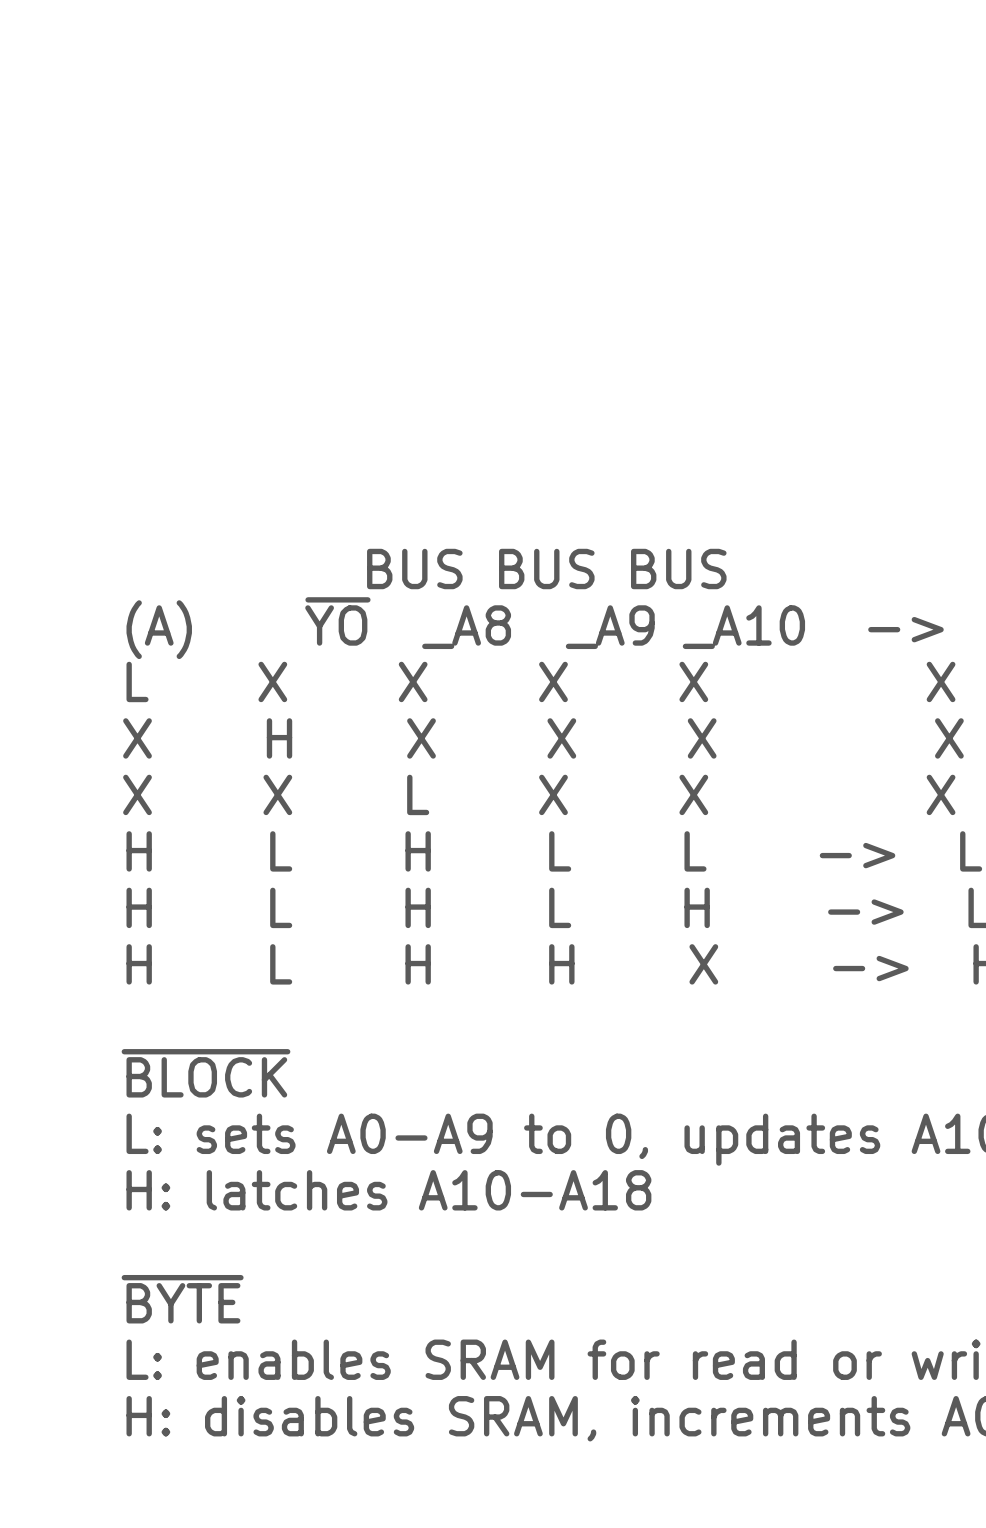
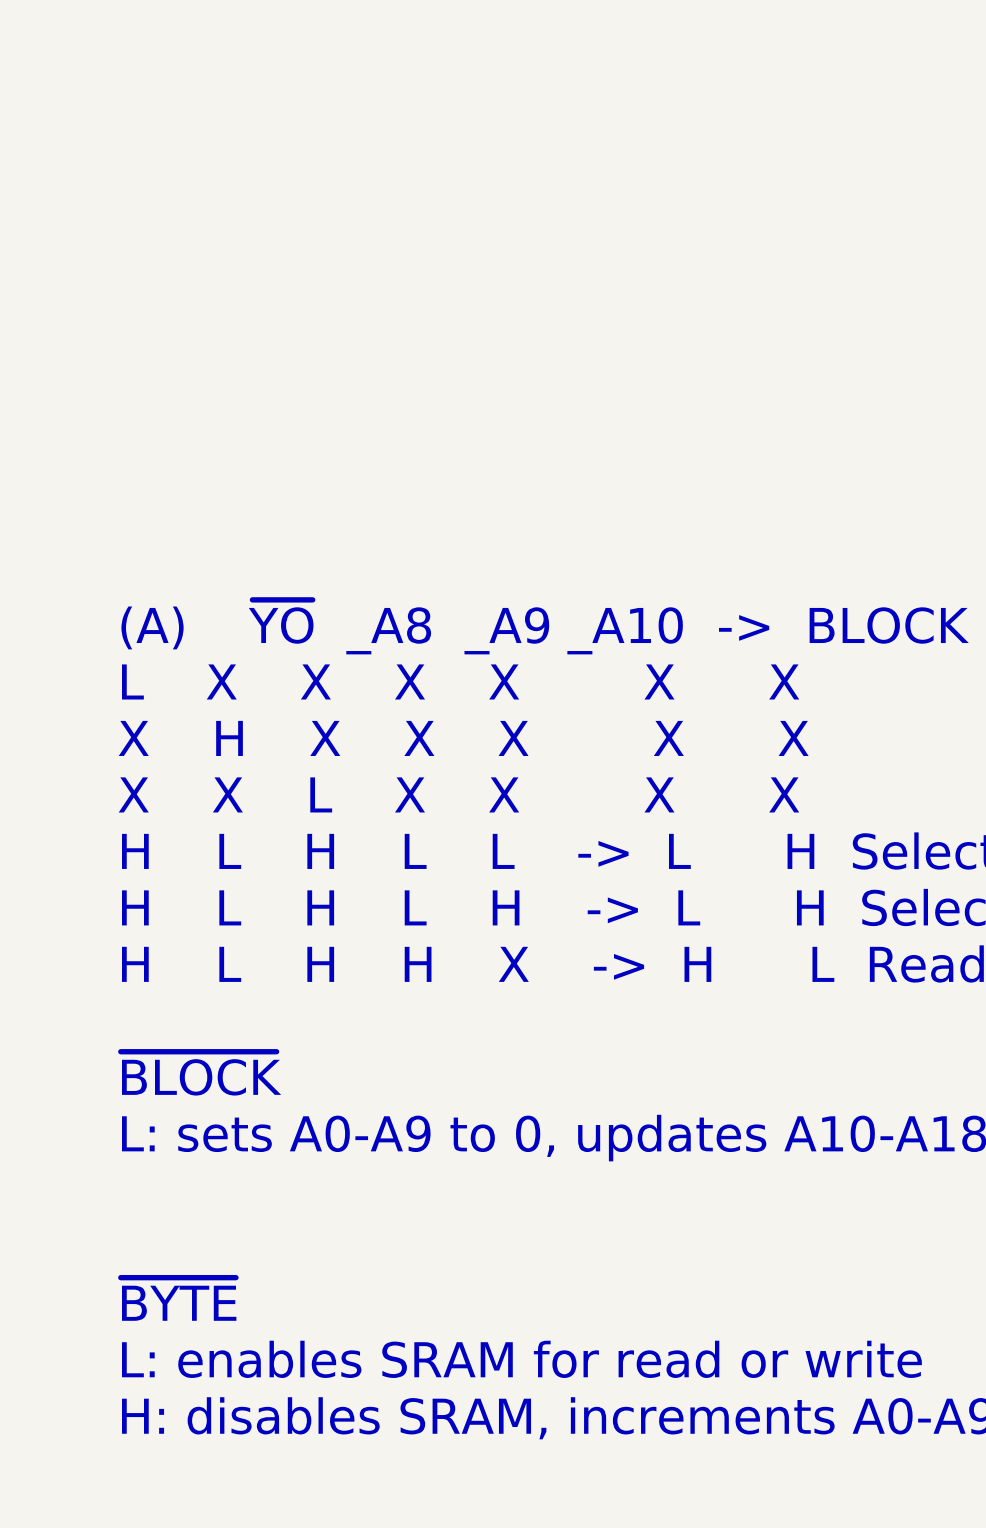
text: BUS BUS BUS (546, 569) -> none
text: H: latches A10-A18 (388, 1190) -> none

